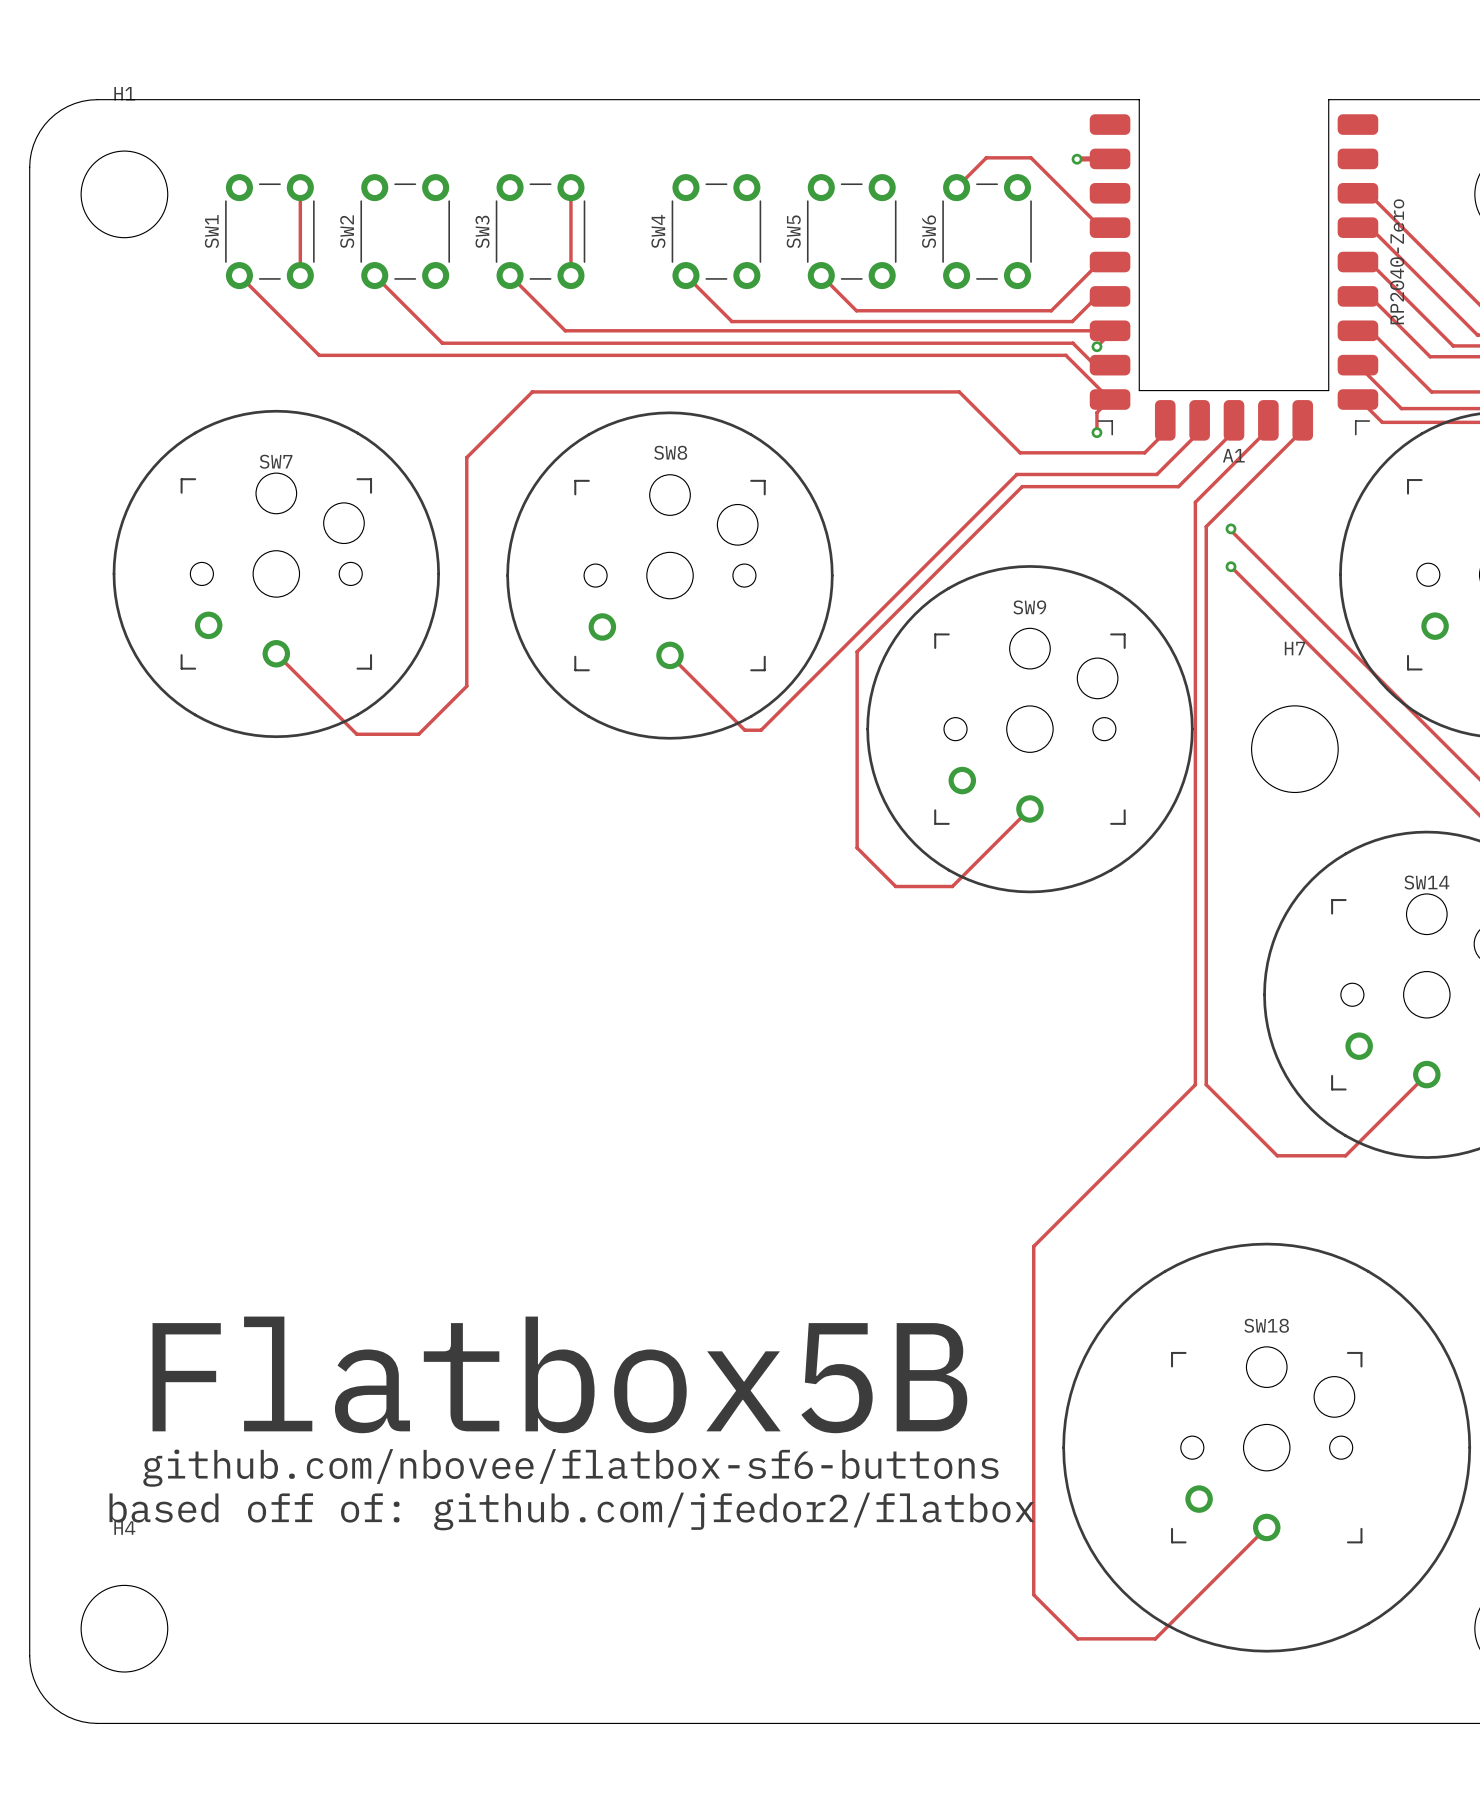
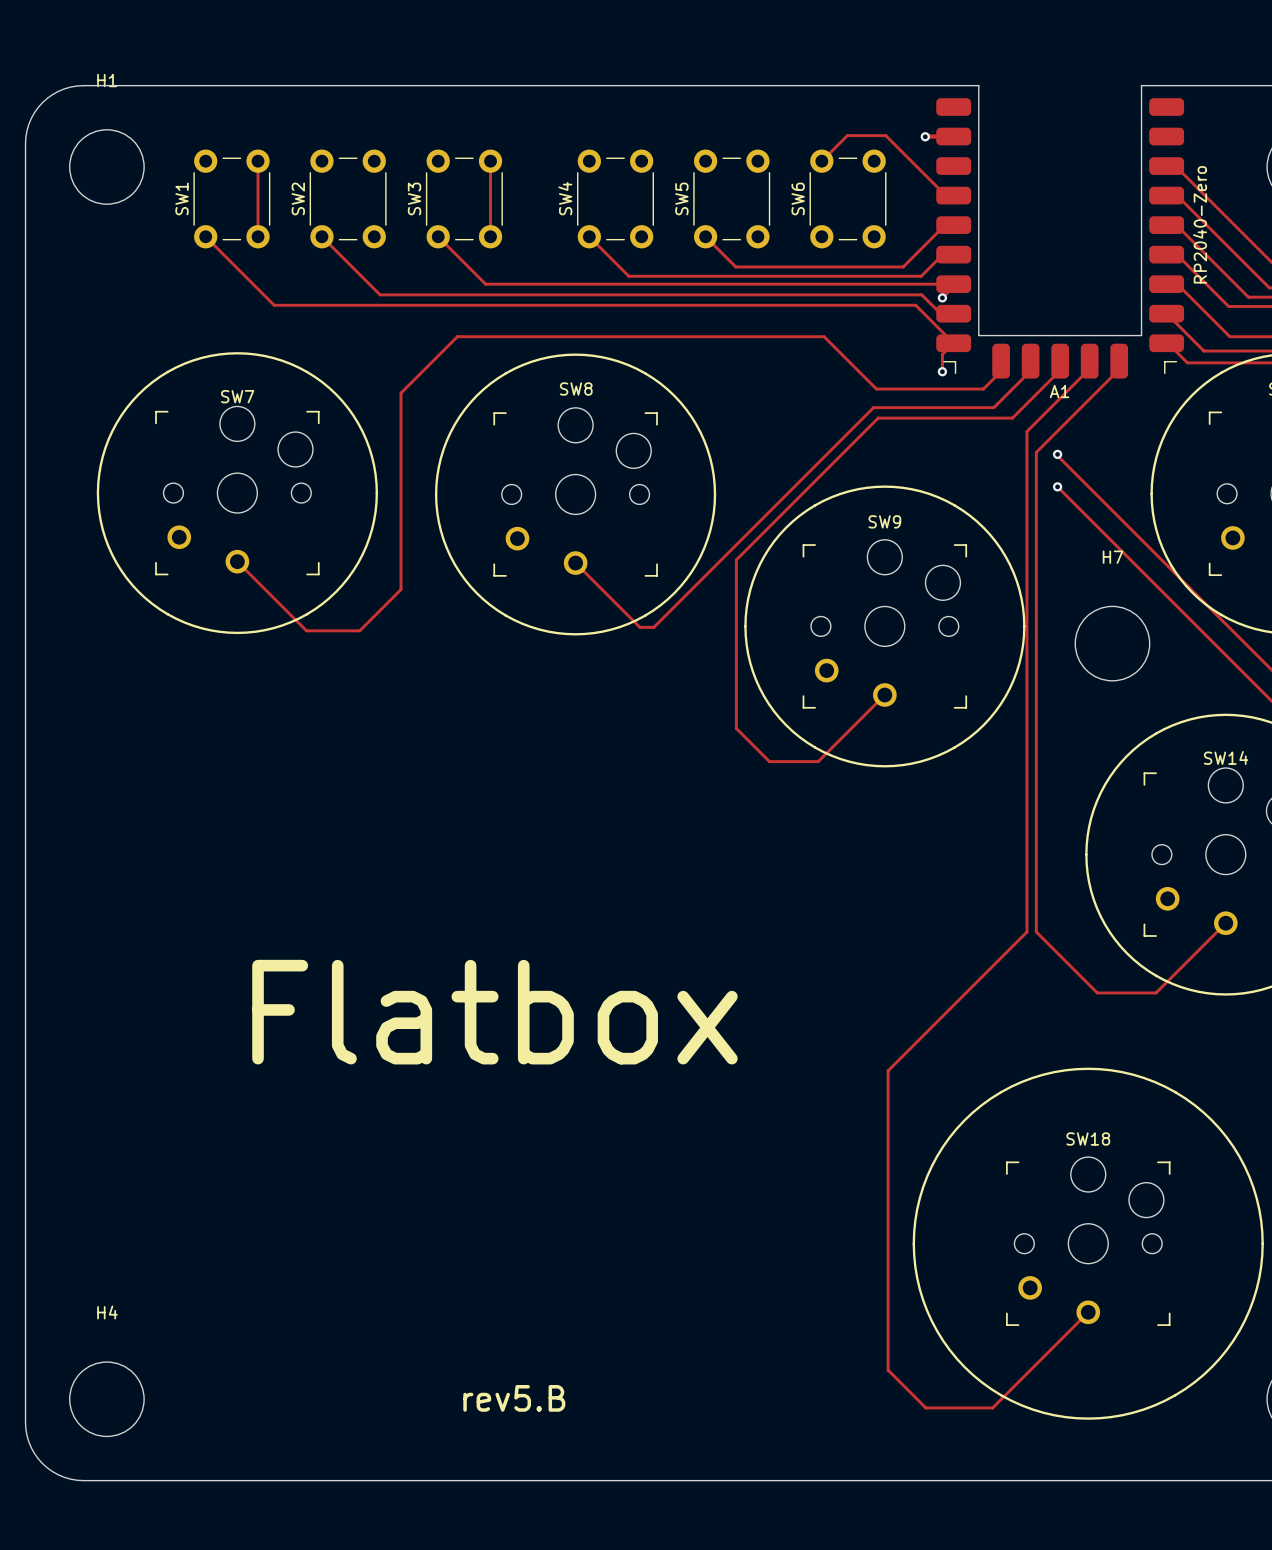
text: Flatbox5B (559, 1374) -> Flatbox (494, 1012)
text: github.com/nbovee/flatbox-sf6-buttons (570, 1467) -> none
text: based off of: github.com/jfedor2/flatbox (571, 1511) -> none
text: none -> rev5.B (514, 1398)

